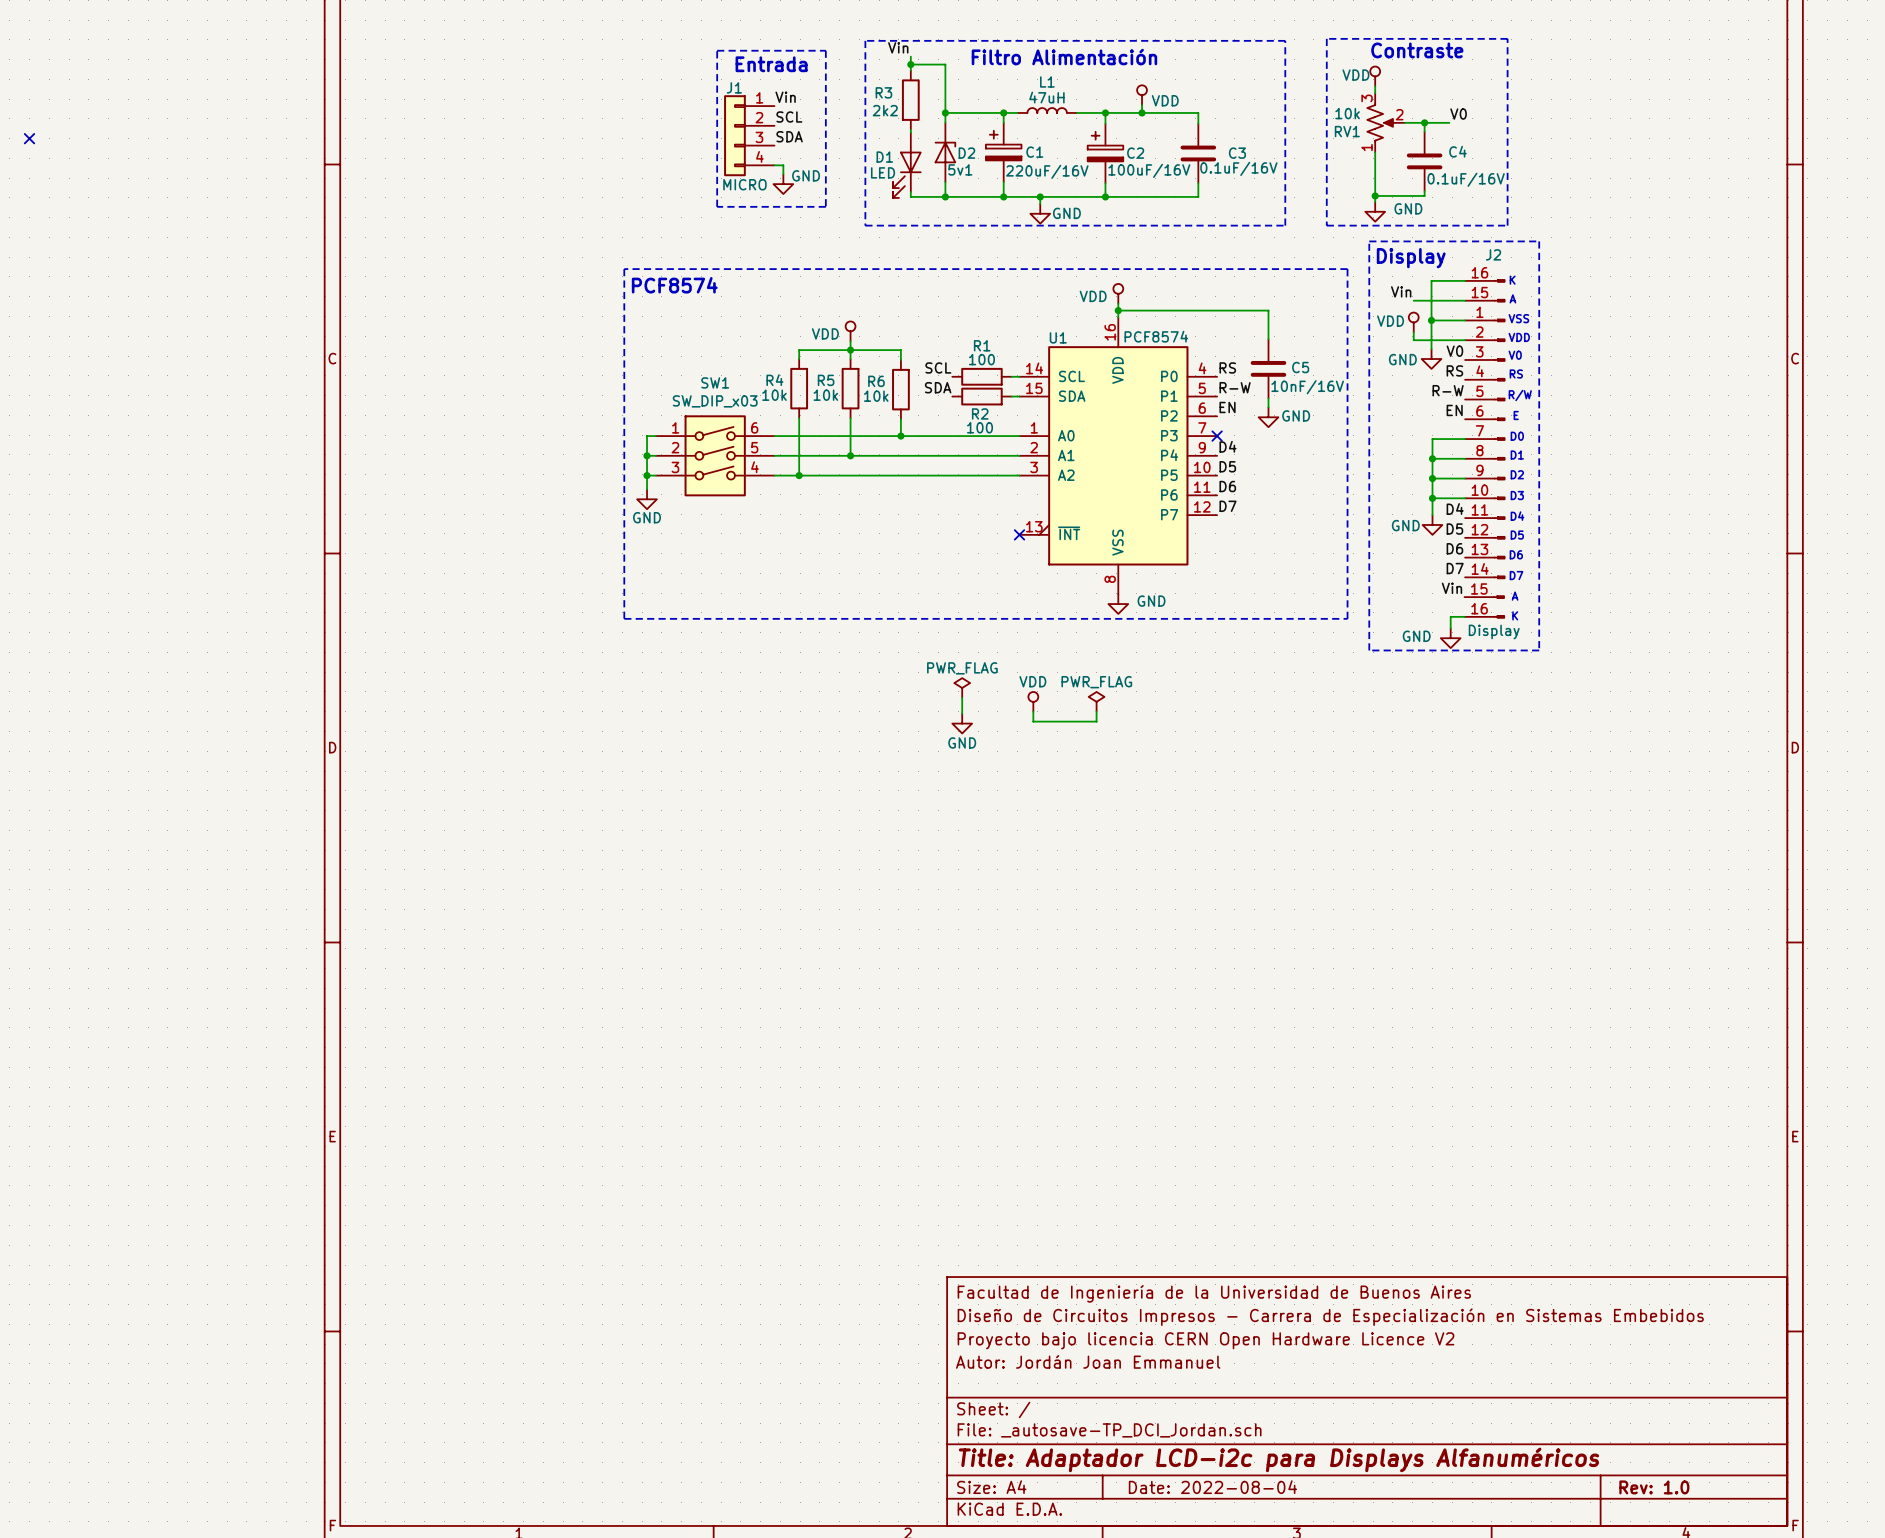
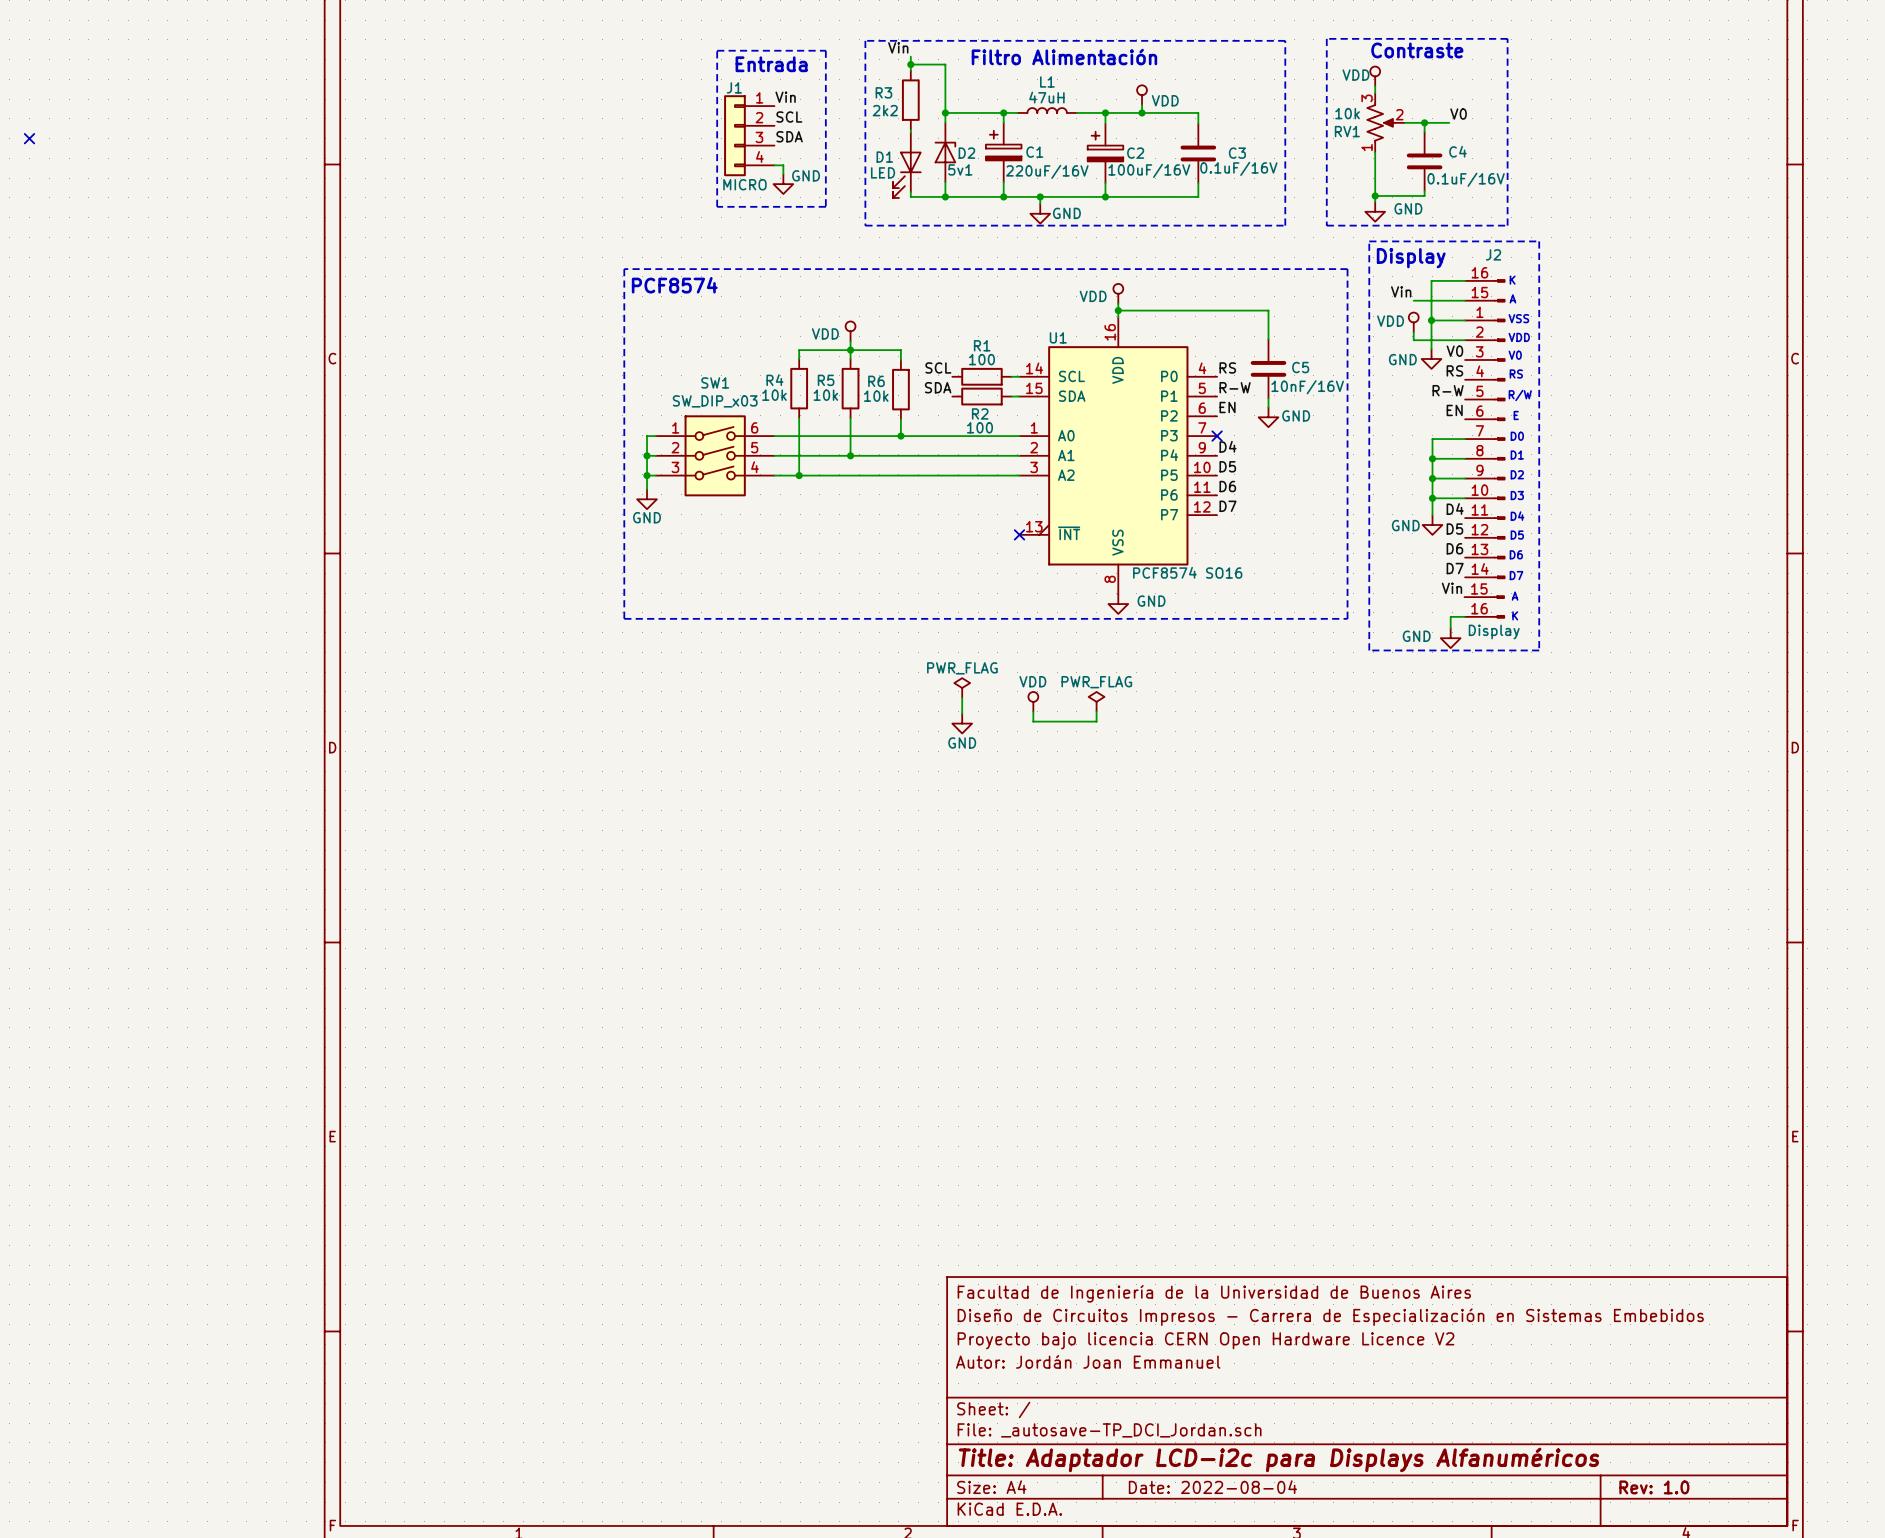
U1 value: PCF8574 (1156, 336) -> PCF8574 SO16 (1187, 572)

